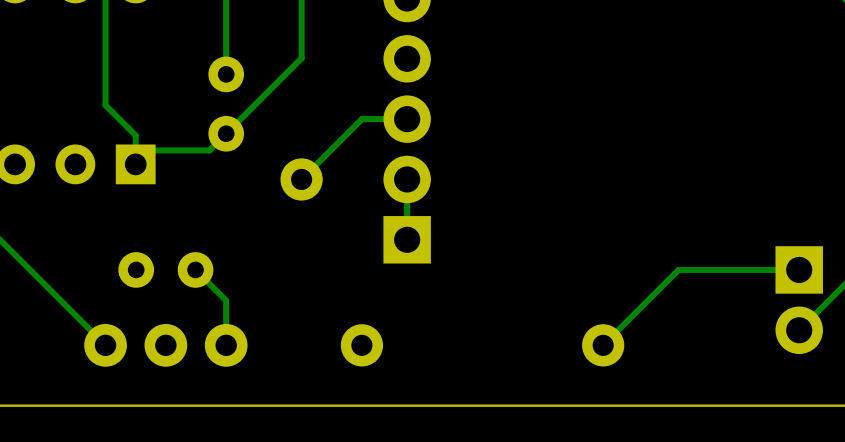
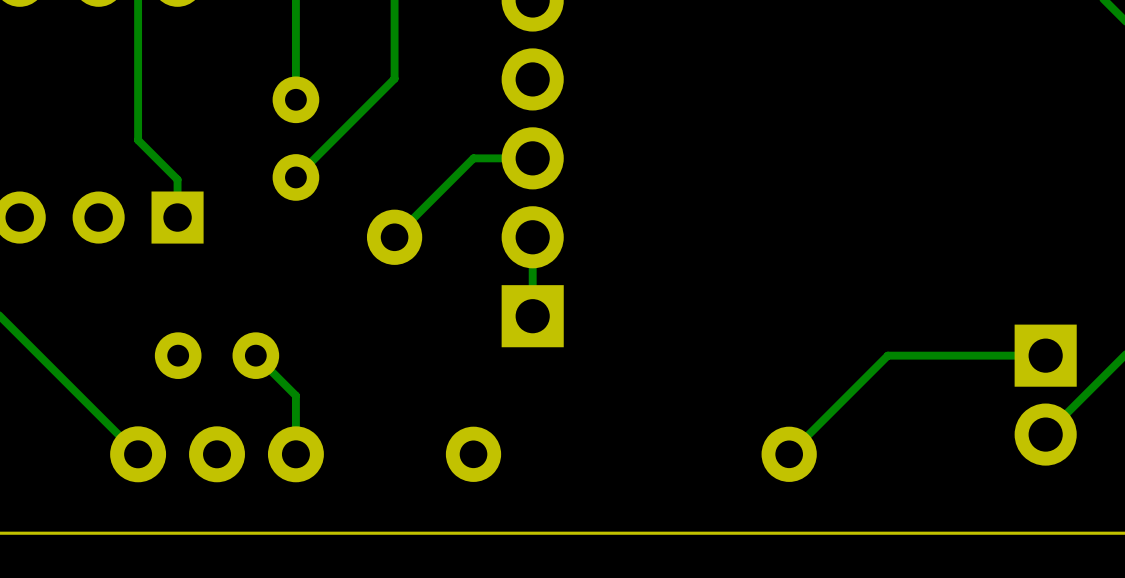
track: (226, 133) (209, 150) (135, 150) -> none

